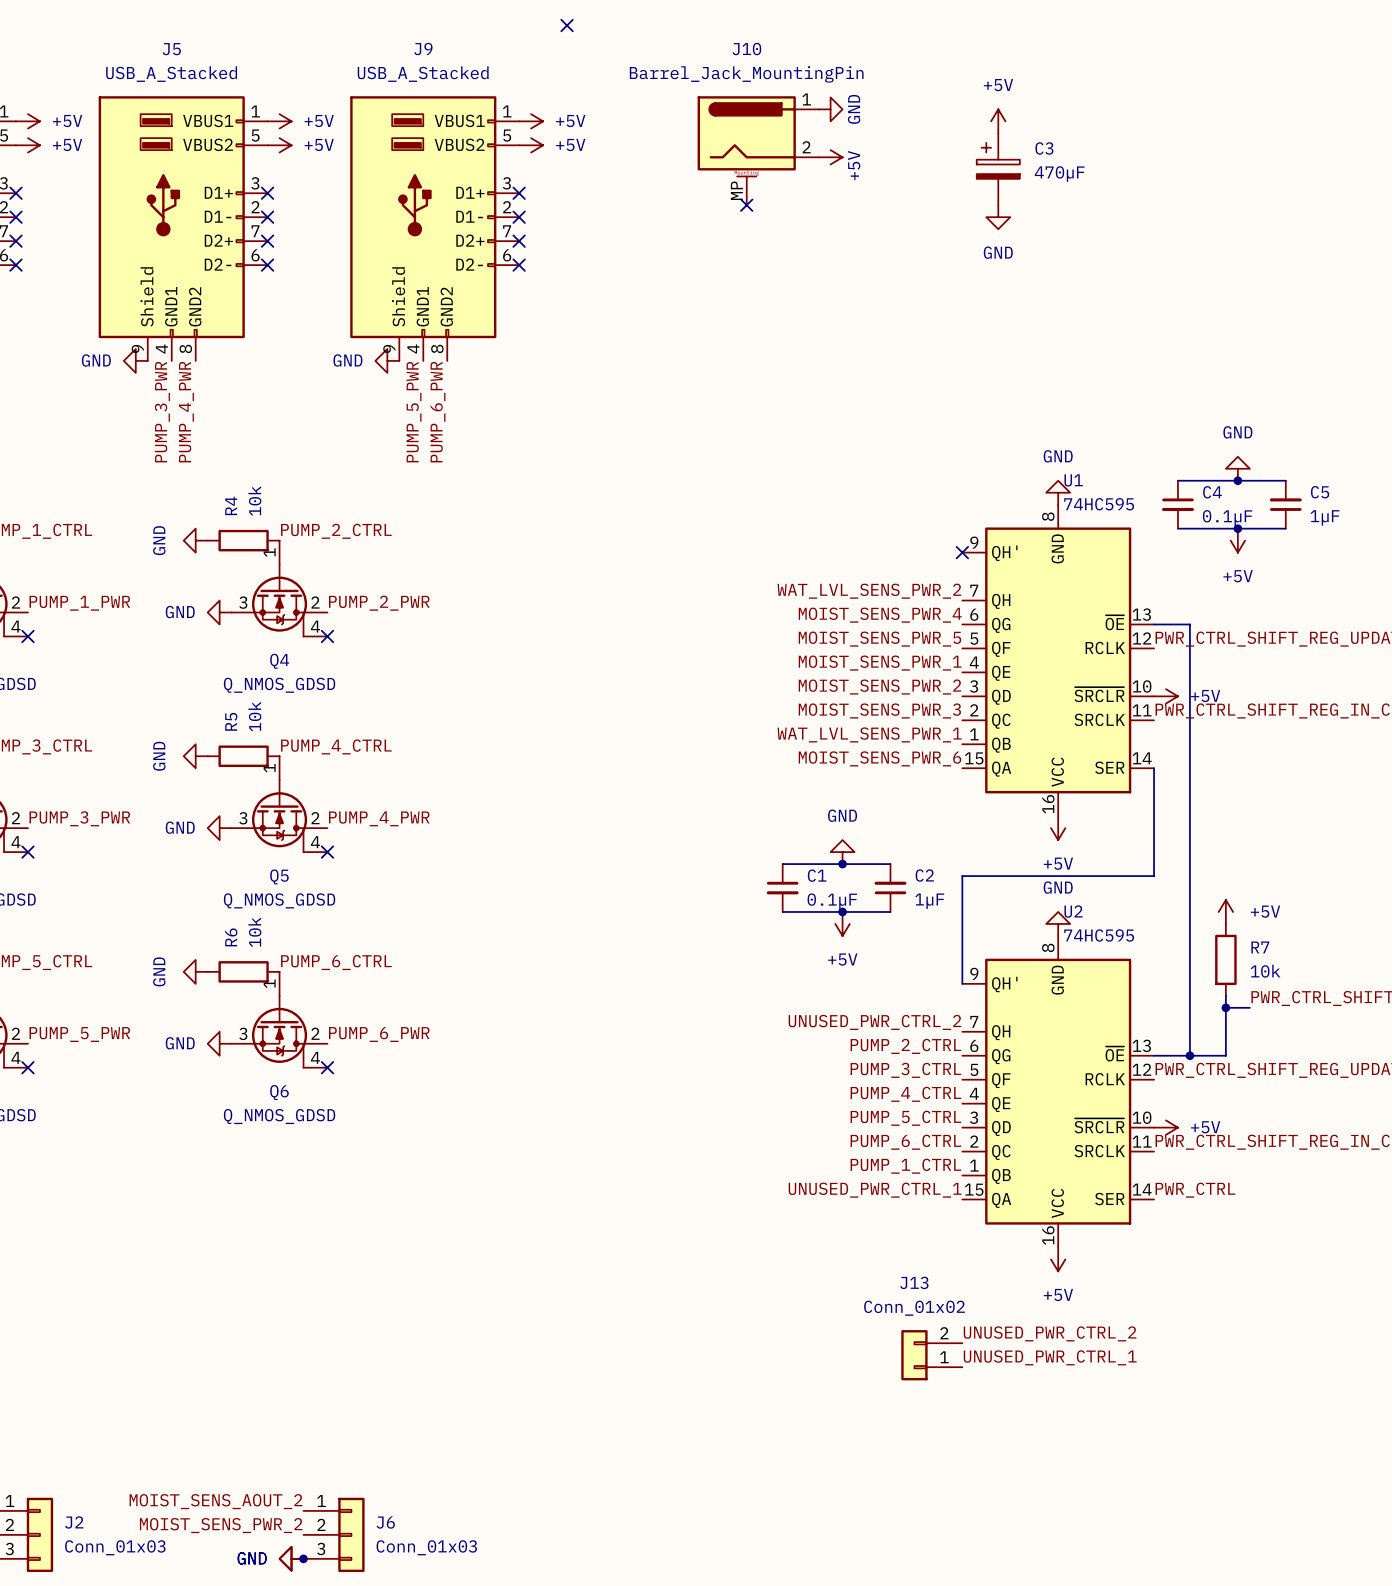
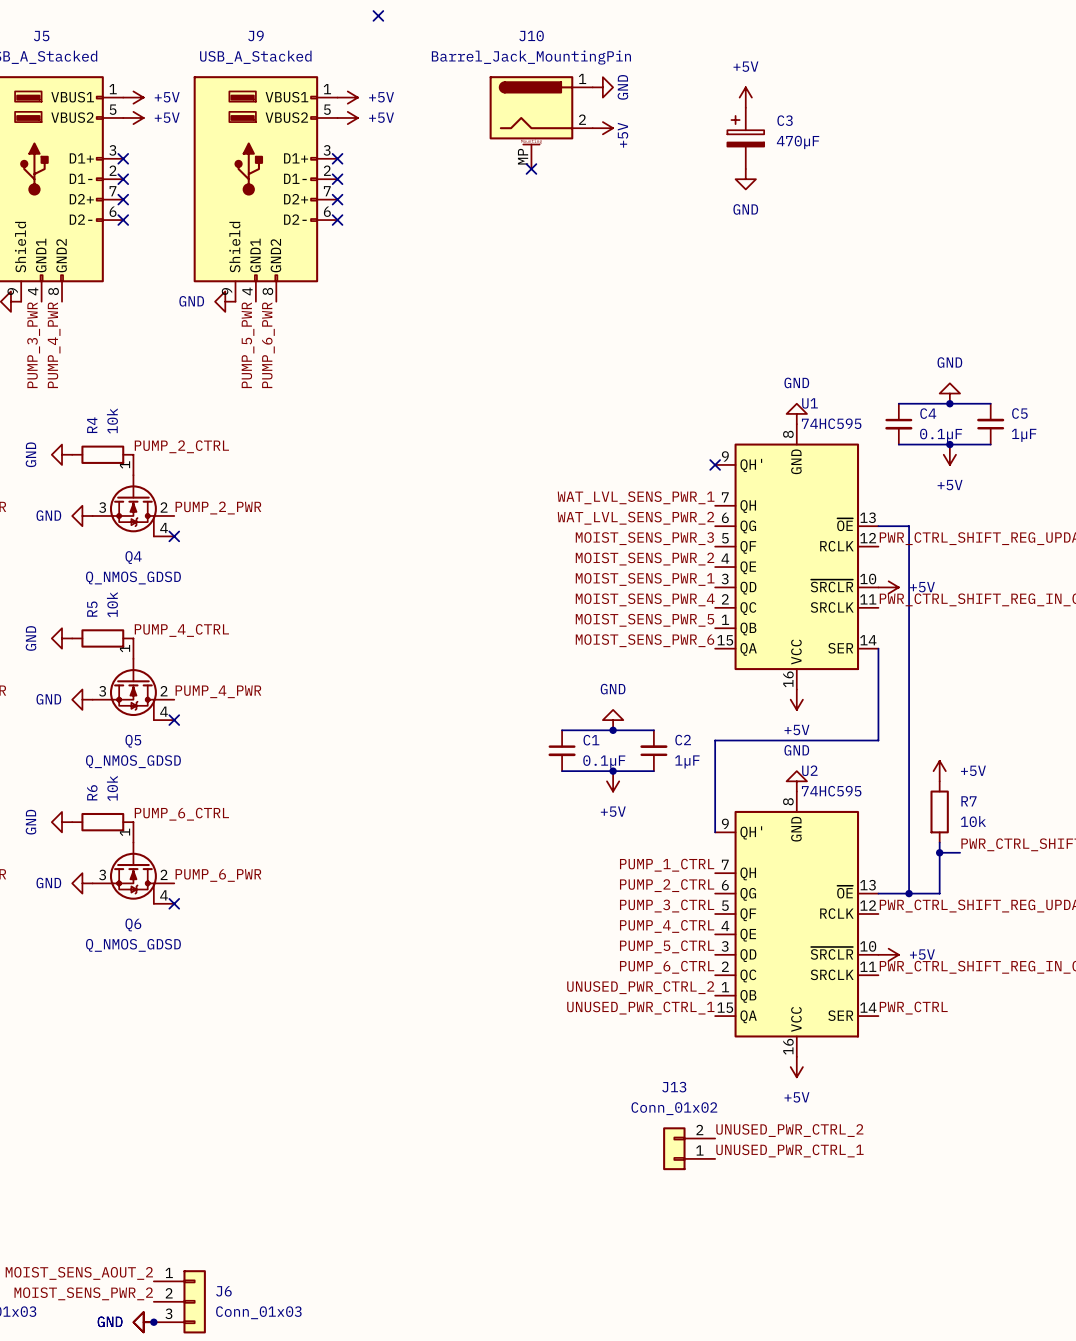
label: WAT_LVL_SENS_PWR_2 (869, 591) -> WAT_LVL_SENS_PWR_1 (636, 497)
label: MOIST_SENS_PWR_4 (880, 615) -> WAT_LVL_SENS_PWR_2 (635, 518)
label: MOIST_SENS_PWR_5 (879, 639) -> MOIST_SENS_PWR_3 (644, 538)
label: MOIST_SENS_PWR_1 (880, 663) -> MOIST_SENS_PWR_2 (645, 559)
label: MOIST_SENS_PWR_2 (880, 687) -> MOIST_SENS_PWR_1 (645, 579)
label: MOIST_SENS_PWR_3 (879, 710) -> MOIST_SENS_PWR_4 (645, 599)
label: WAT_LVL_SENS_PWR_1 (869, 734) -> MOIST_SENS_PWR_5 (644, 620)
label: UNUSED_PWR_CTRL_2 (874, 1022) -> PUMP_1_CTRL (667, 865)
label: PUMP_1_CTRL (905, 1166) -> UNUSED_PWR_CTRL_2 (640, 987)

